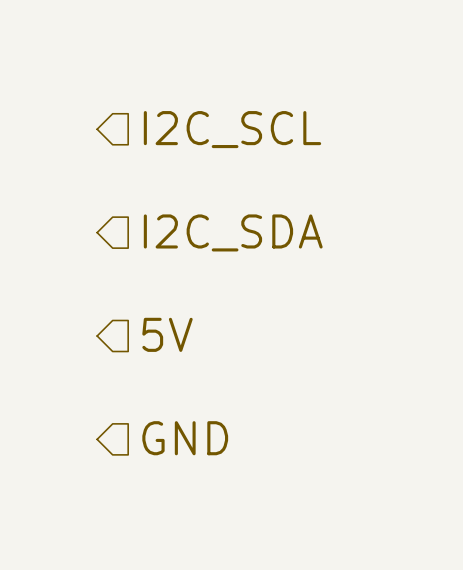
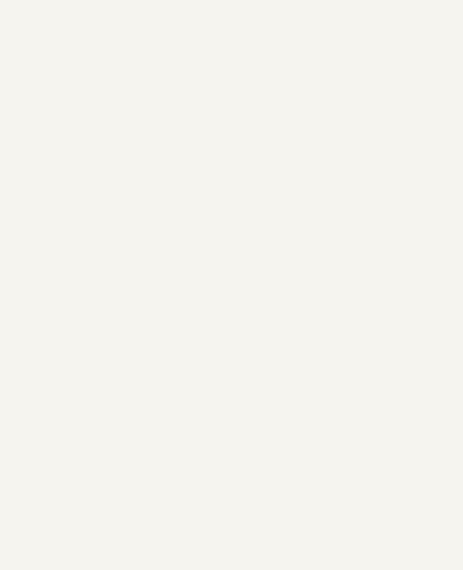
hierarchical label: I2C_SCL (232, 129) -> none
hierarchical label: I2C_SDA (233, 232) -> none
hierarchical label: 5V (167, 334) -> none
hierarchical label: GND (185, 438) -> none

